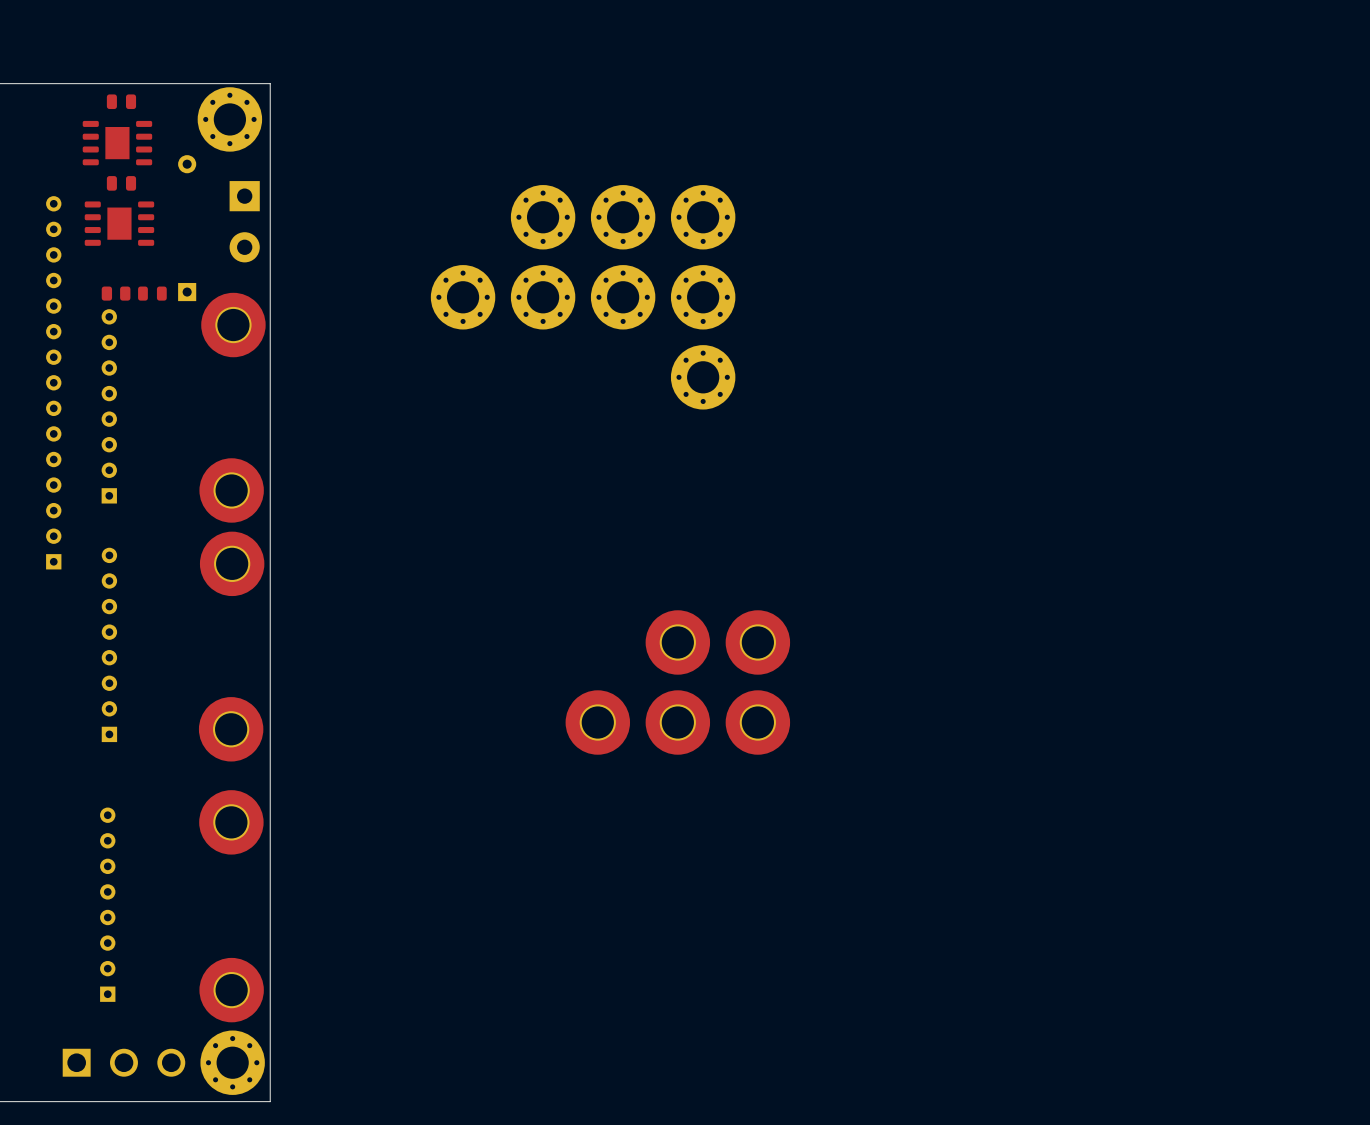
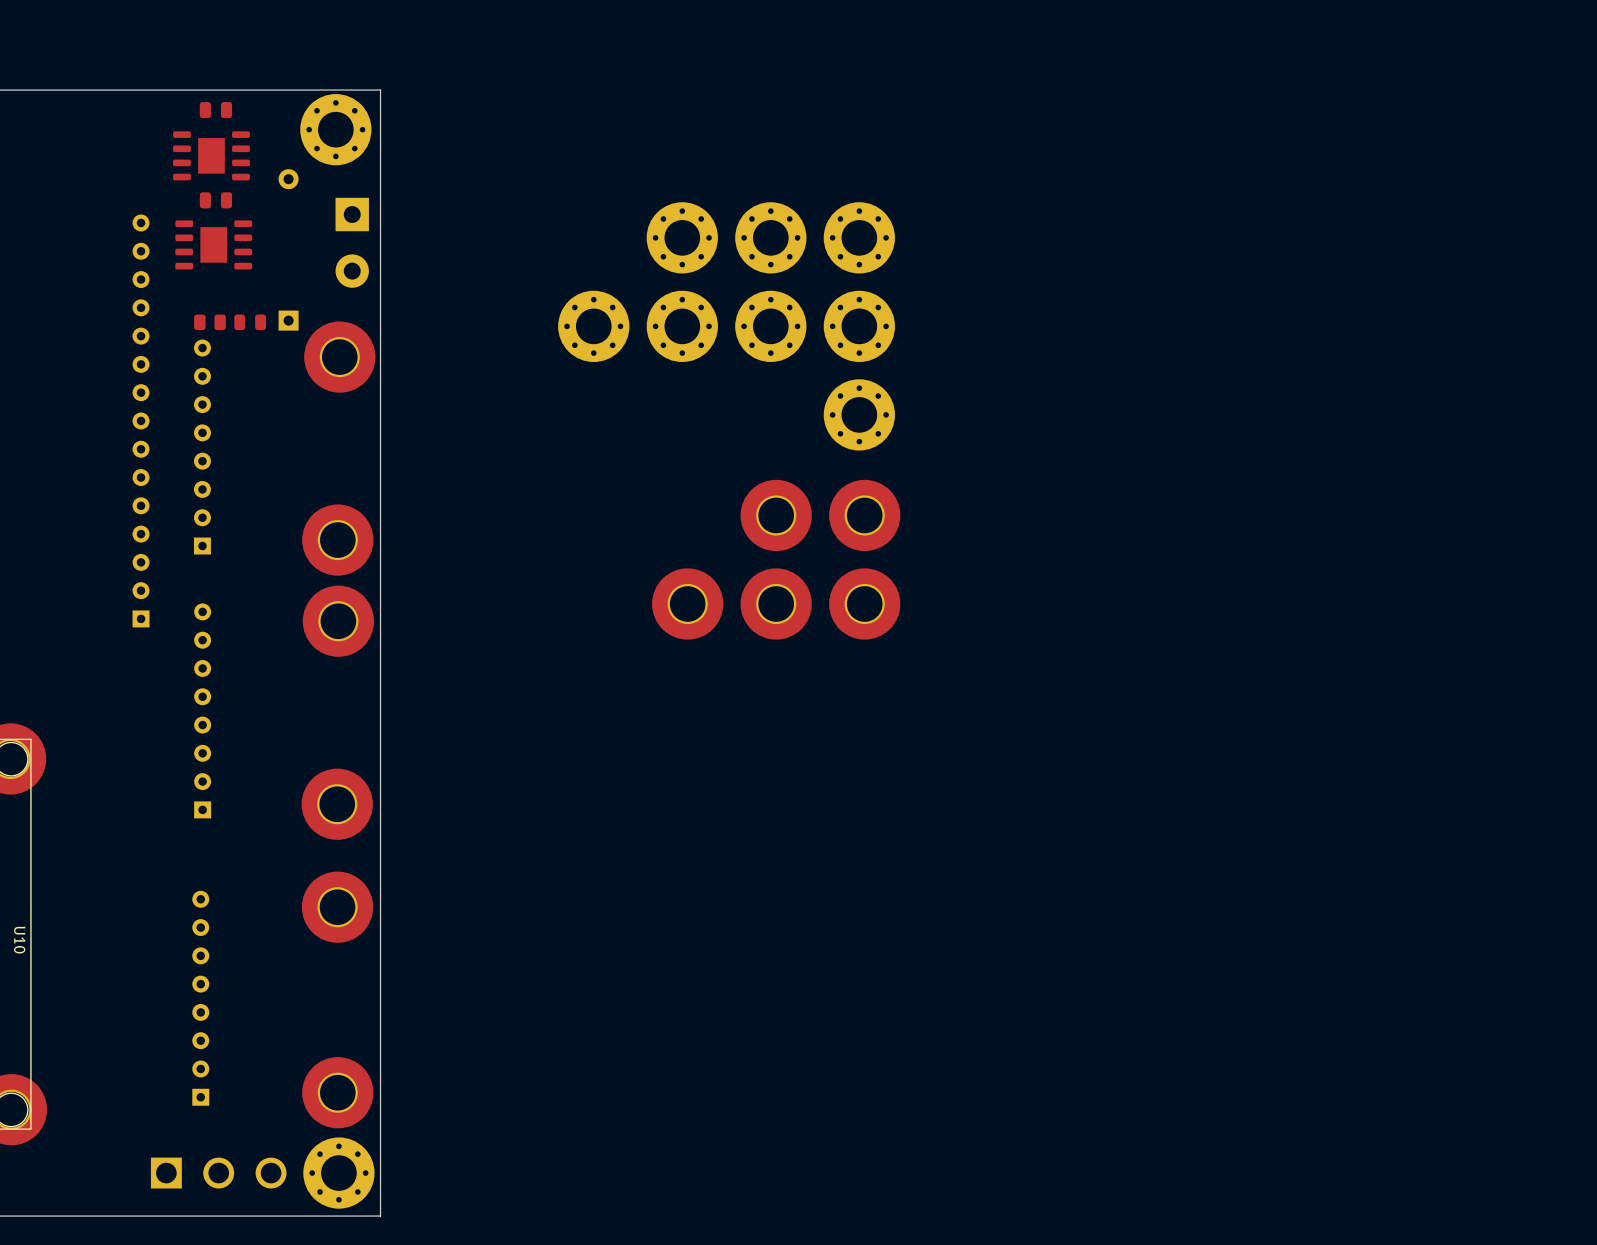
part: none -> (776, 515)
part: none -> (864, 515)
part: none -> (687, 603)
part: none -> (776, 603)
part: none -> (864, 603)
part: (677, 642) -> none
part: (757, 642) -> none
part: (597, 722) -> none
part: (677, 722) -> none
part: (757, 722) -> none

